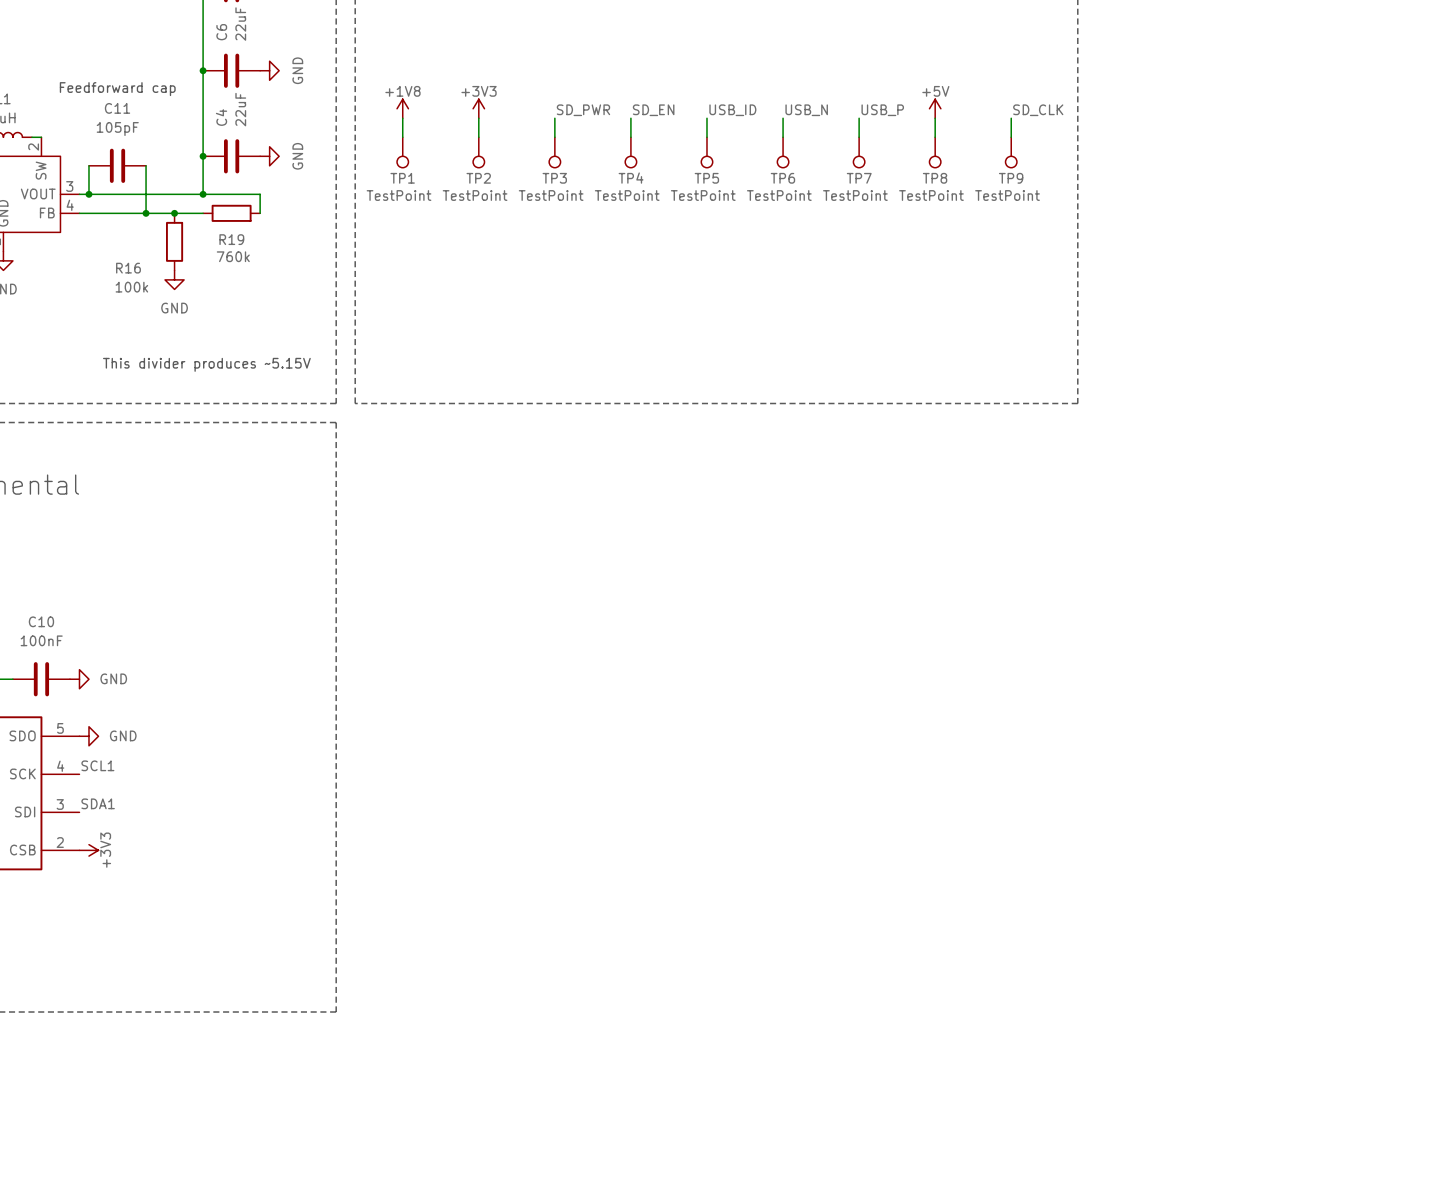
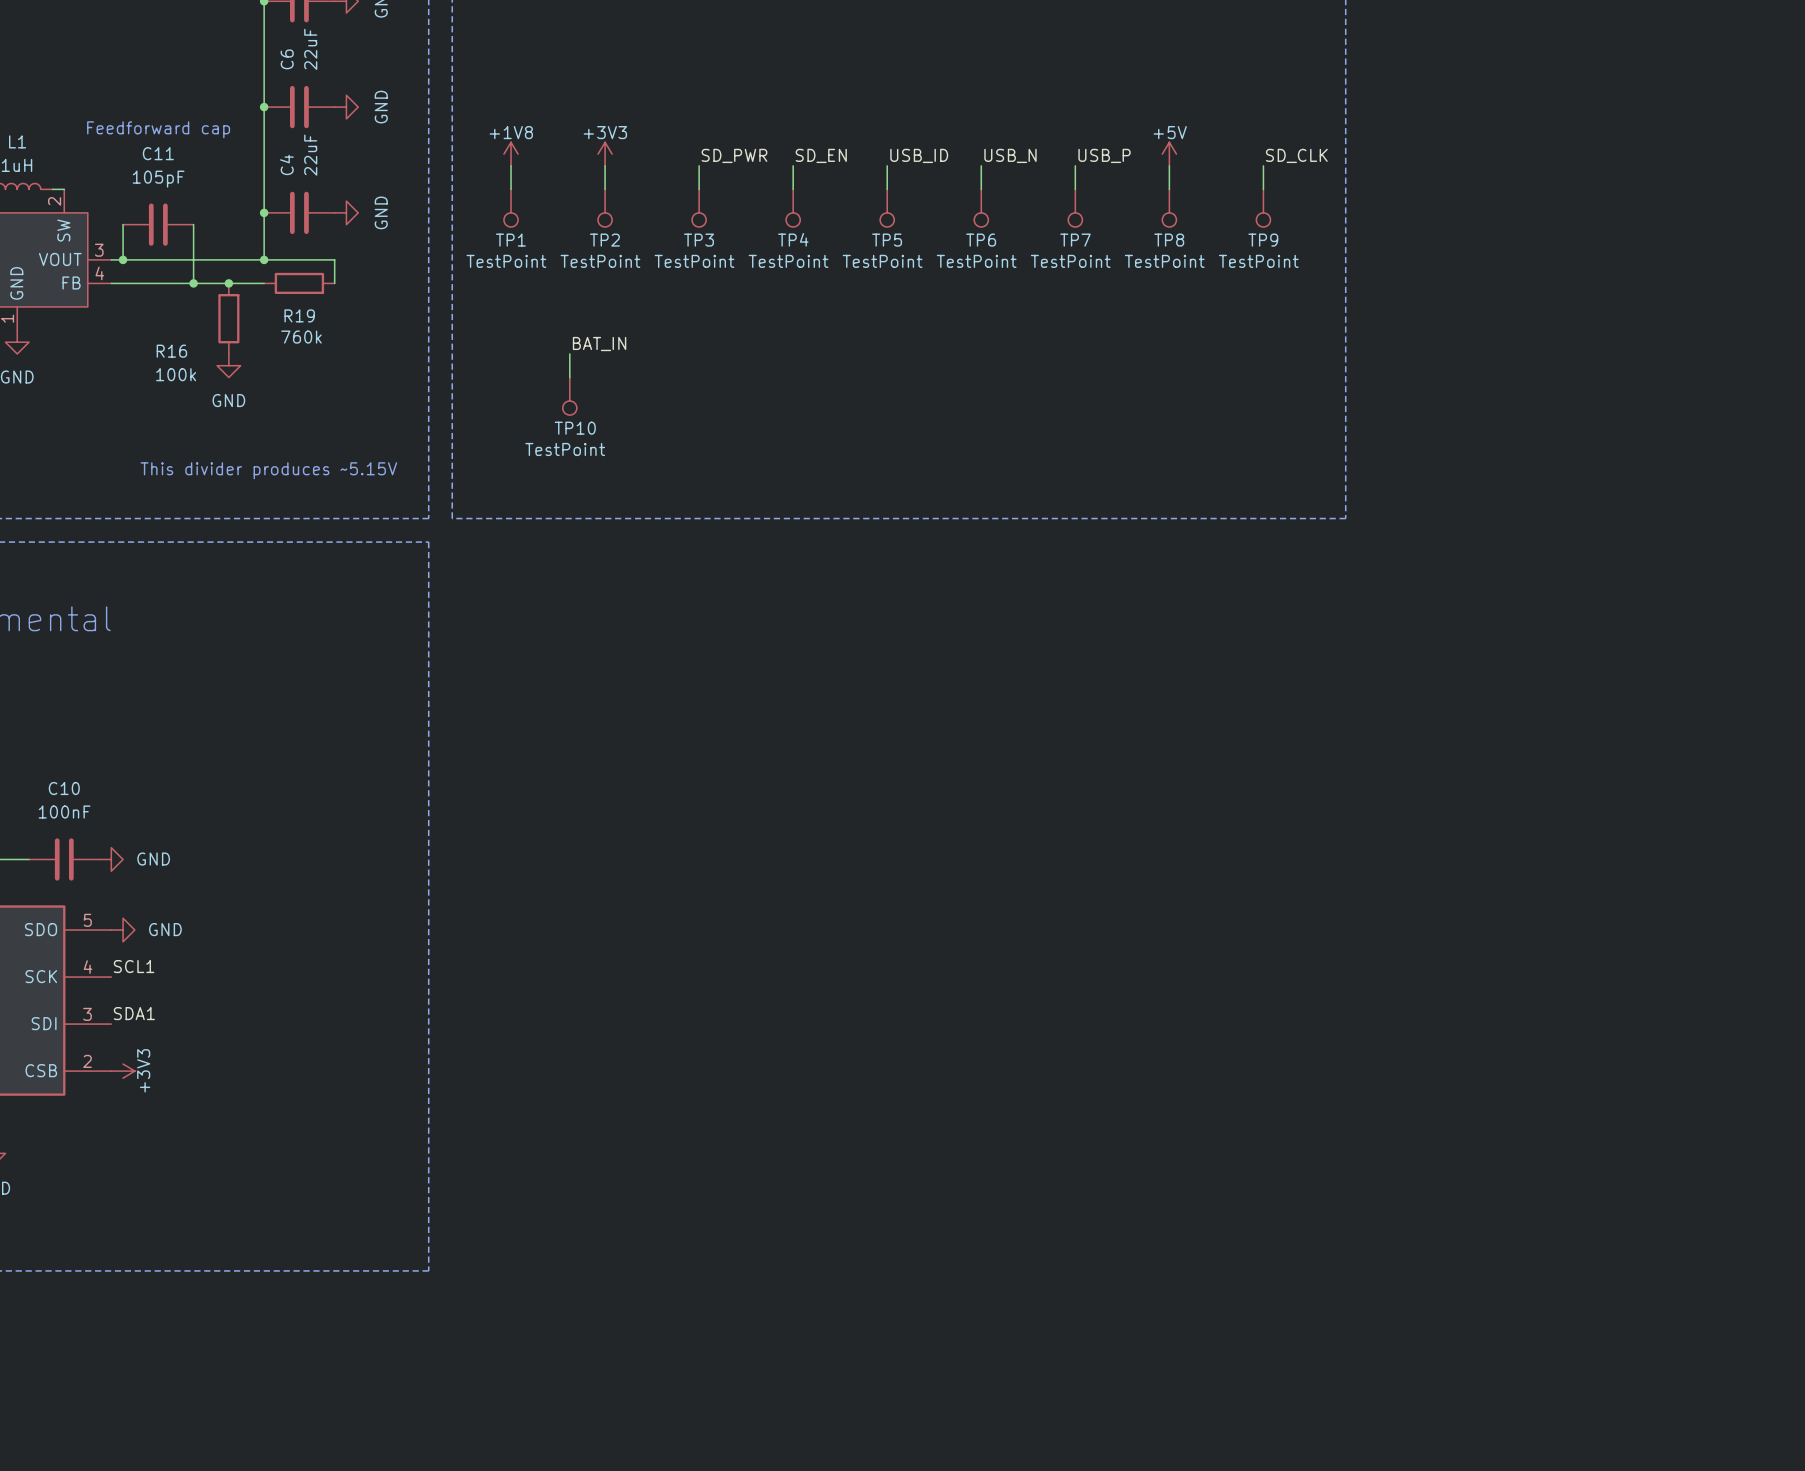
label: none -> BAT_IN (599, 344)
wire: none -> (569, 353) (569, 377)
TP10: none -> TestPoint (569, 396)

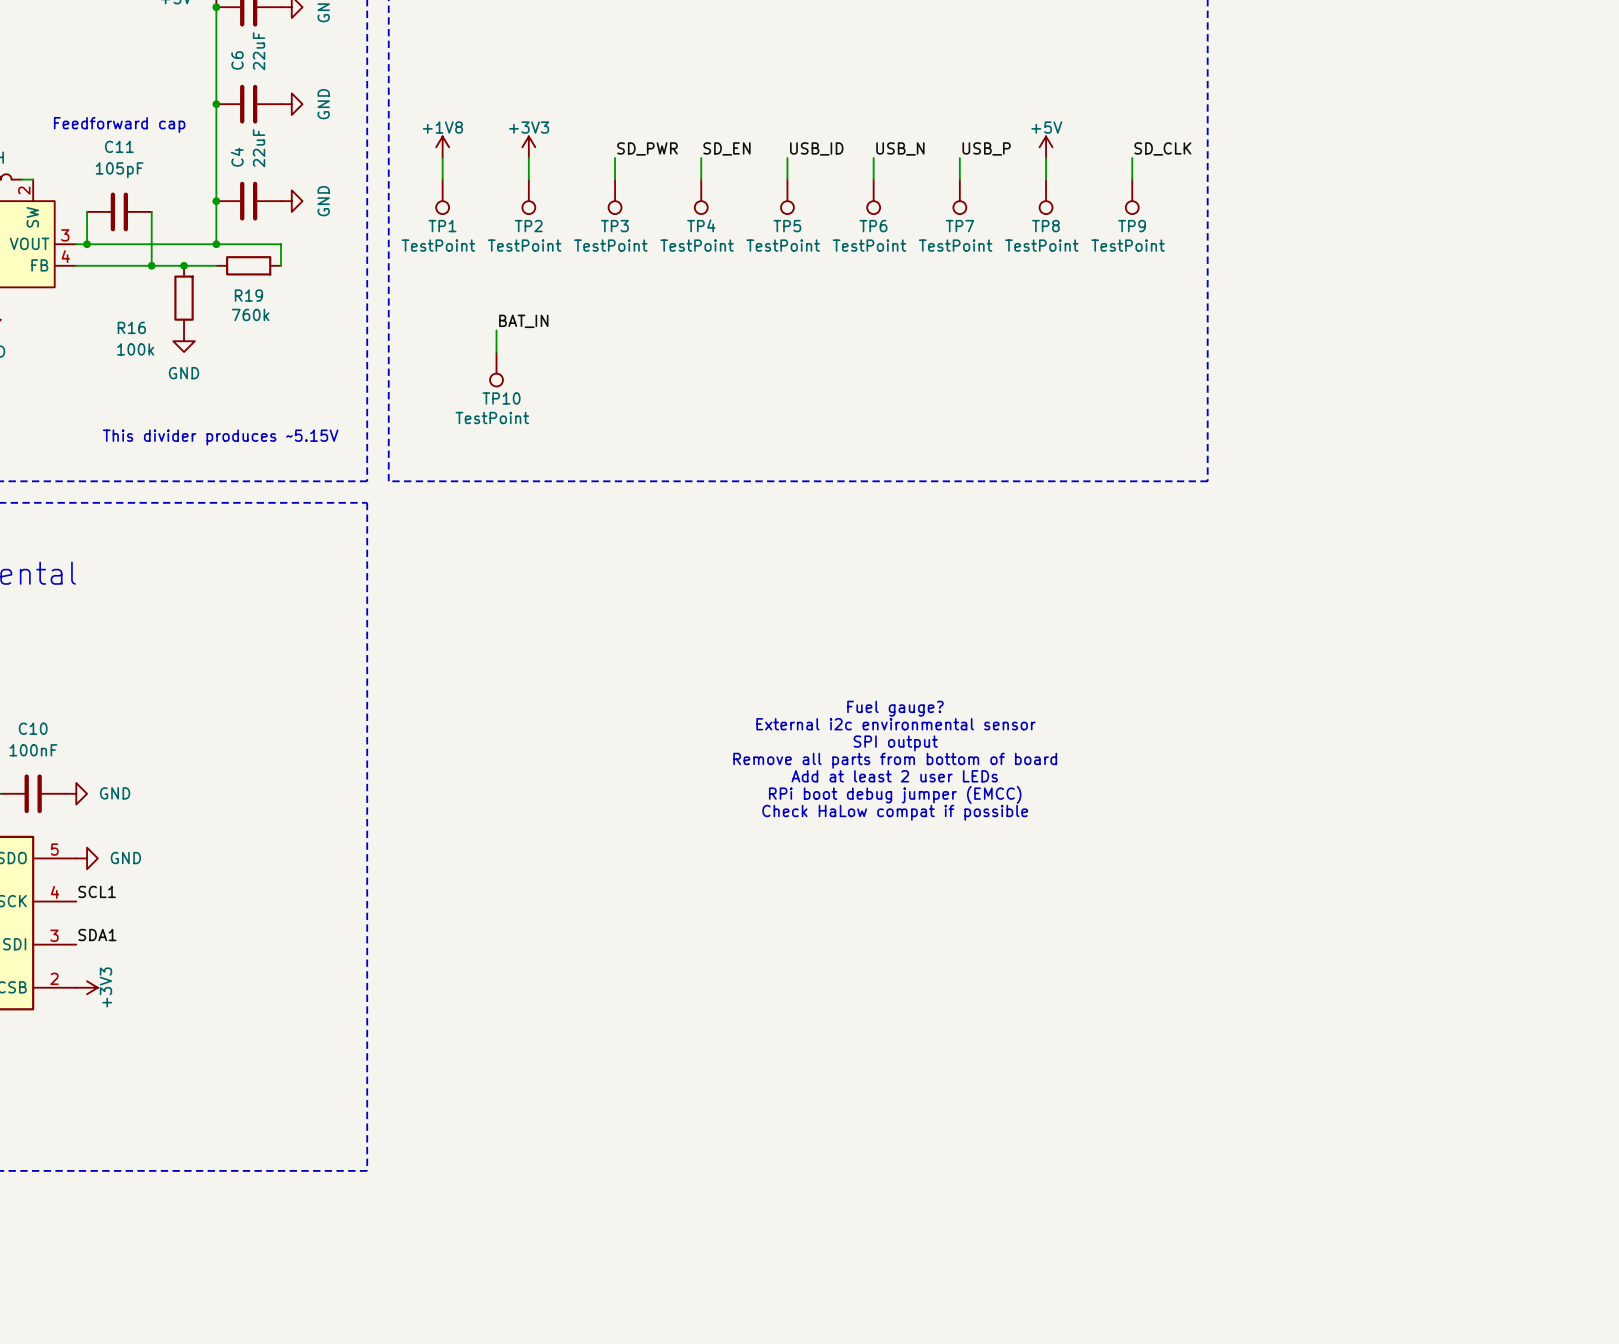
text: none -> Fuel gauge? (895, 708)
text: none -> External i2c environmental sensor (895, 724)
text: none -> SPI output (895, 743)
text: none -> Remove all parts from bottom of board (895, 760)
text: none -> Add at least 2 user LEDs (894, 776)
text: none -> RPi boot debug jumper (EMCC) (895, 794)
text: none -> Check HaLow compat if possible (895, 812)

